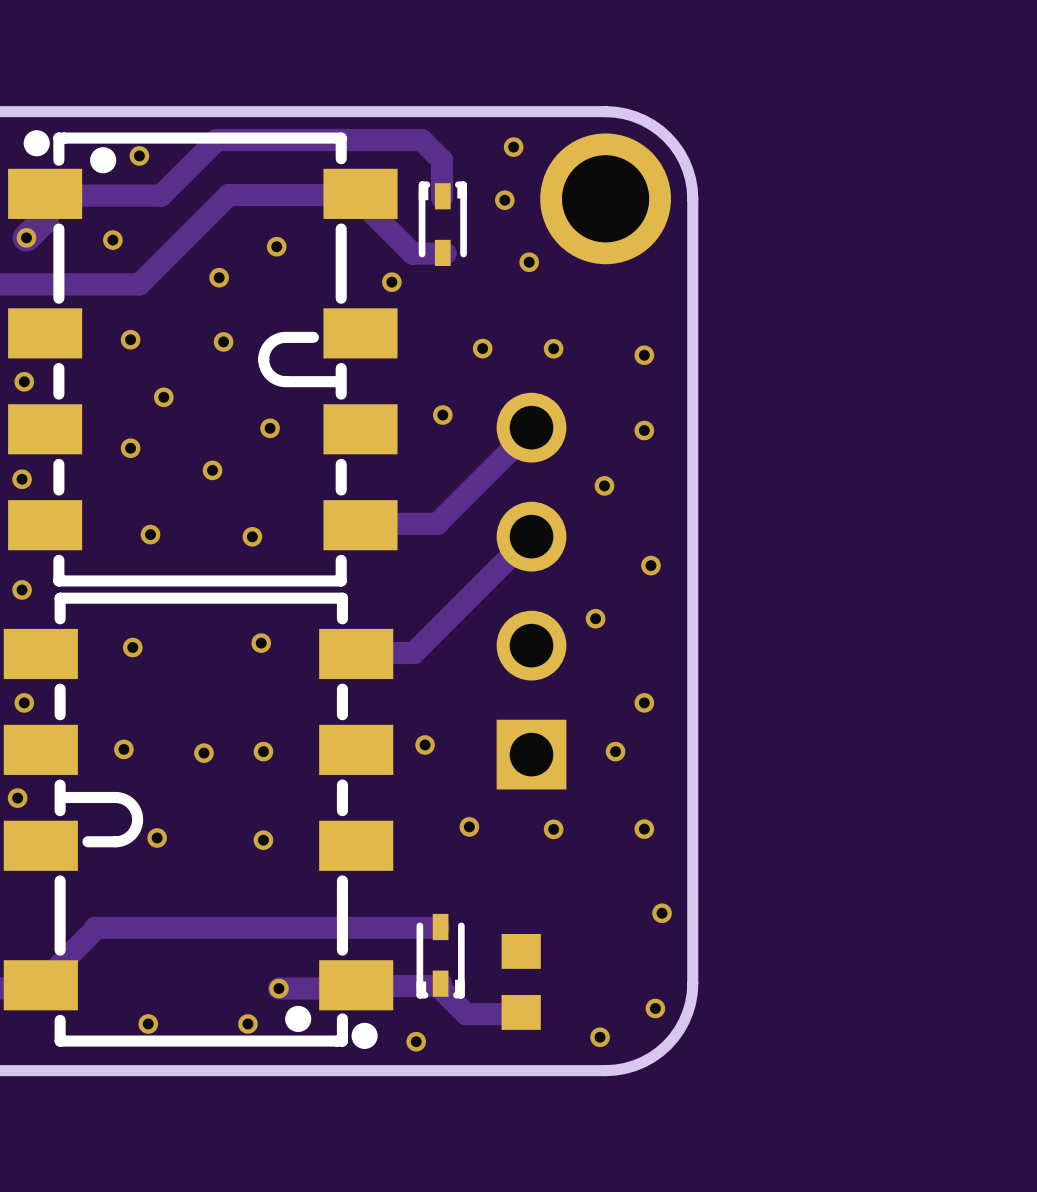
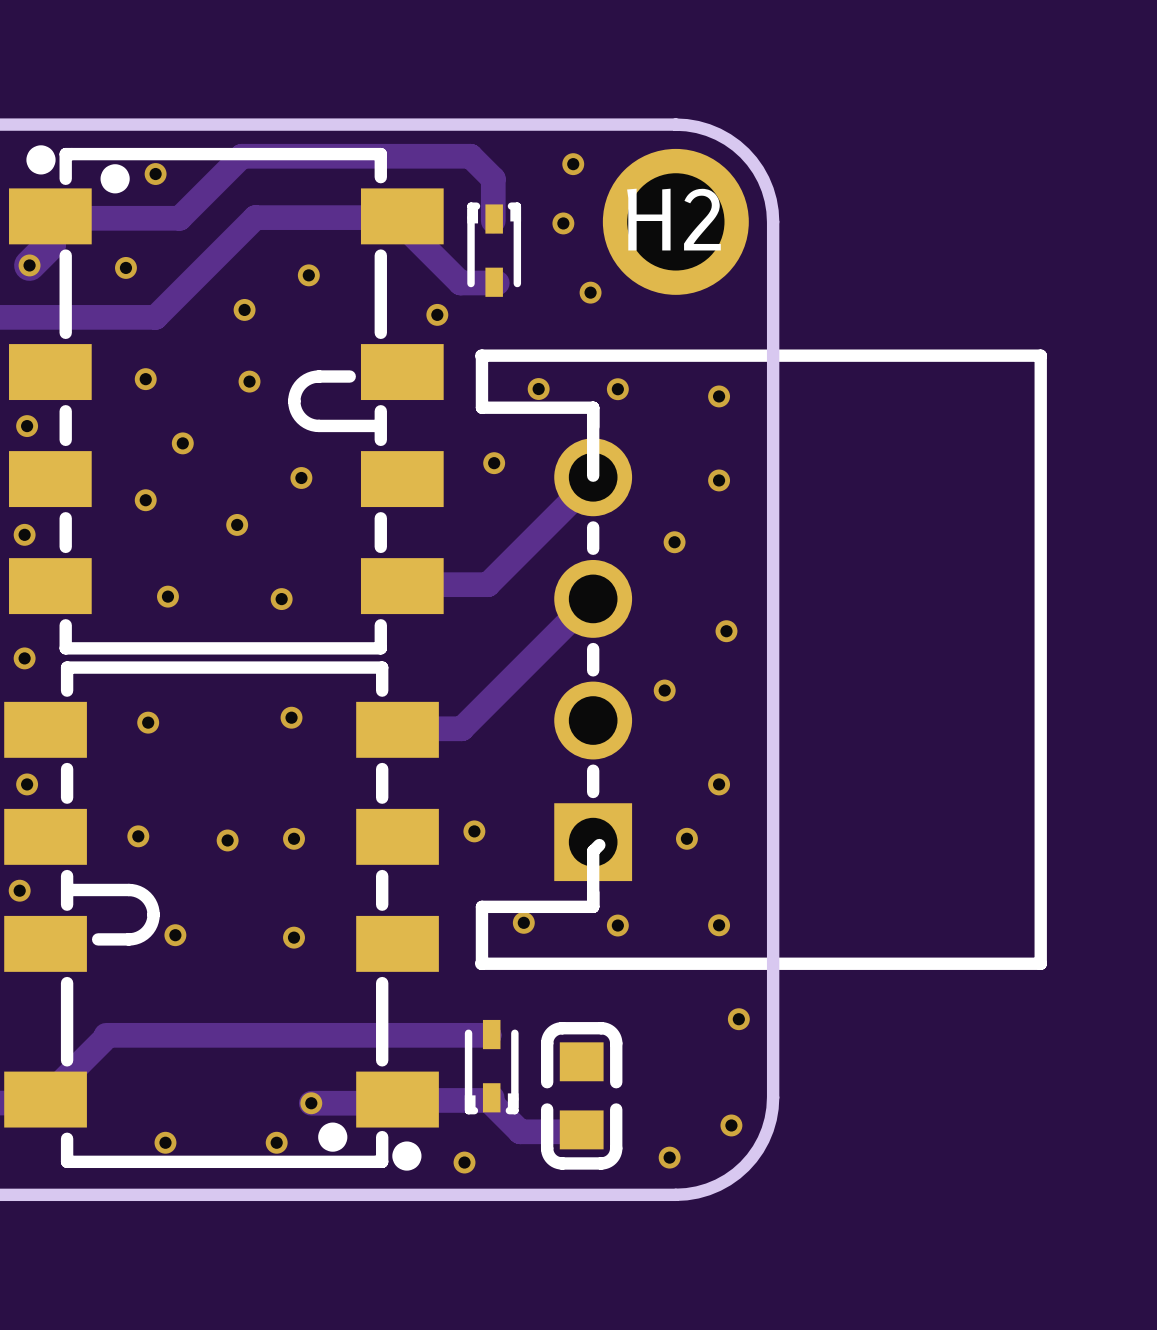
H2 name: none -> H2 (673, 219)
part: (531, 591) -> none
part: none -> (760, 659)
part footprint: [501, 933, 541, 1030] -> [540, 1022, 623, 1170]

